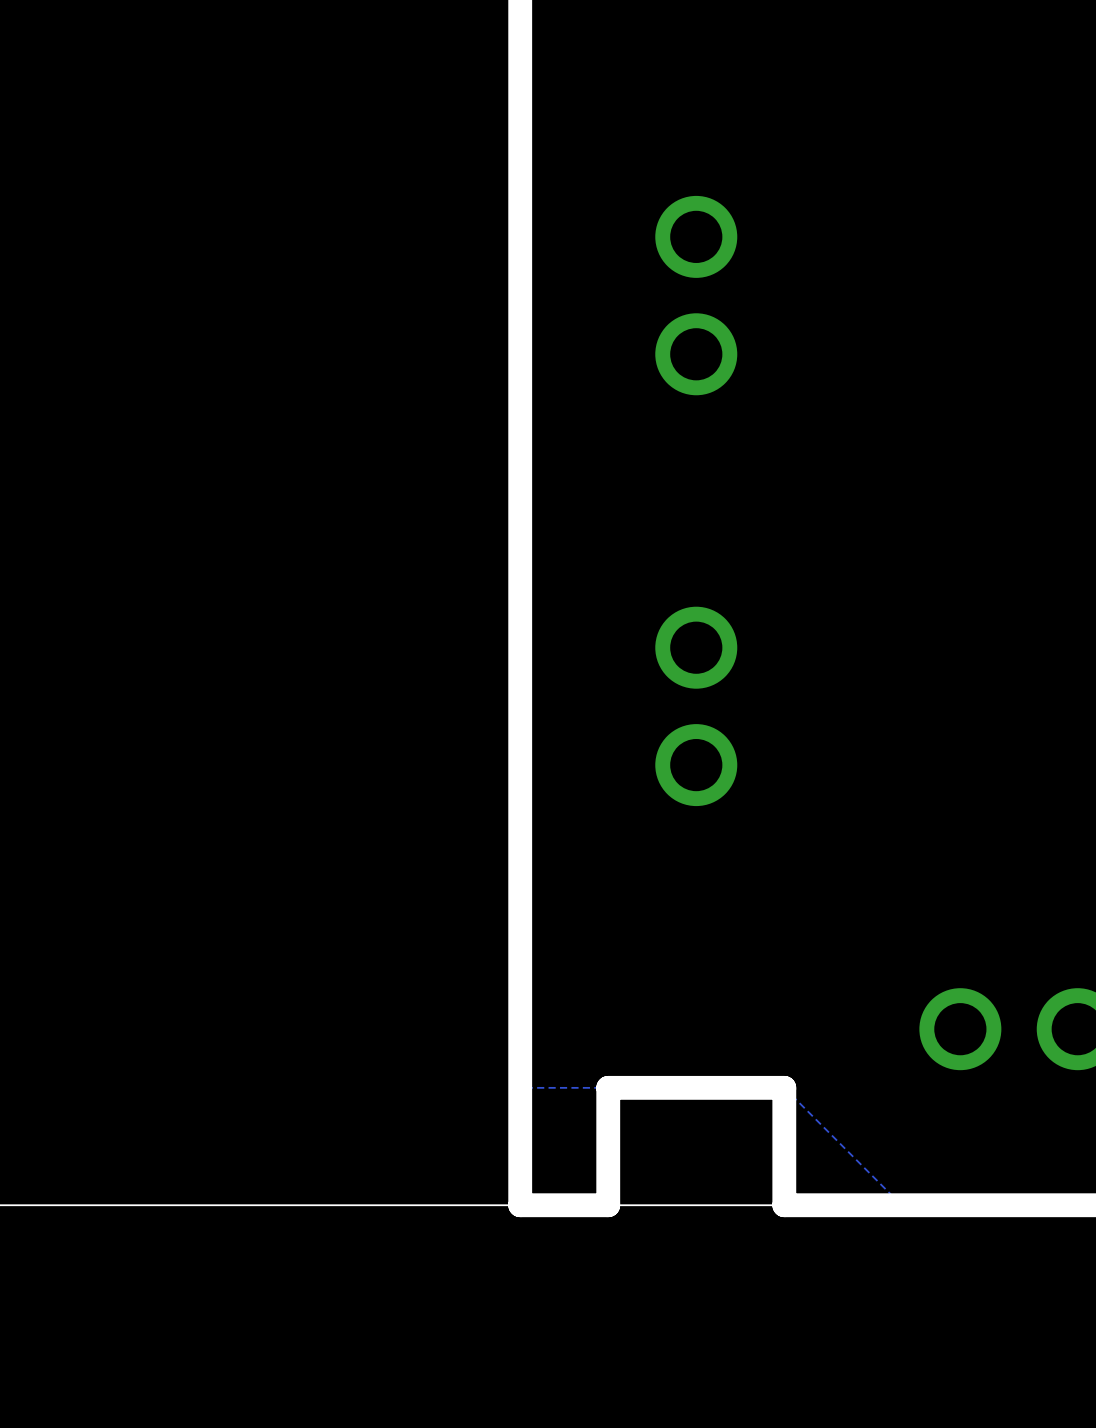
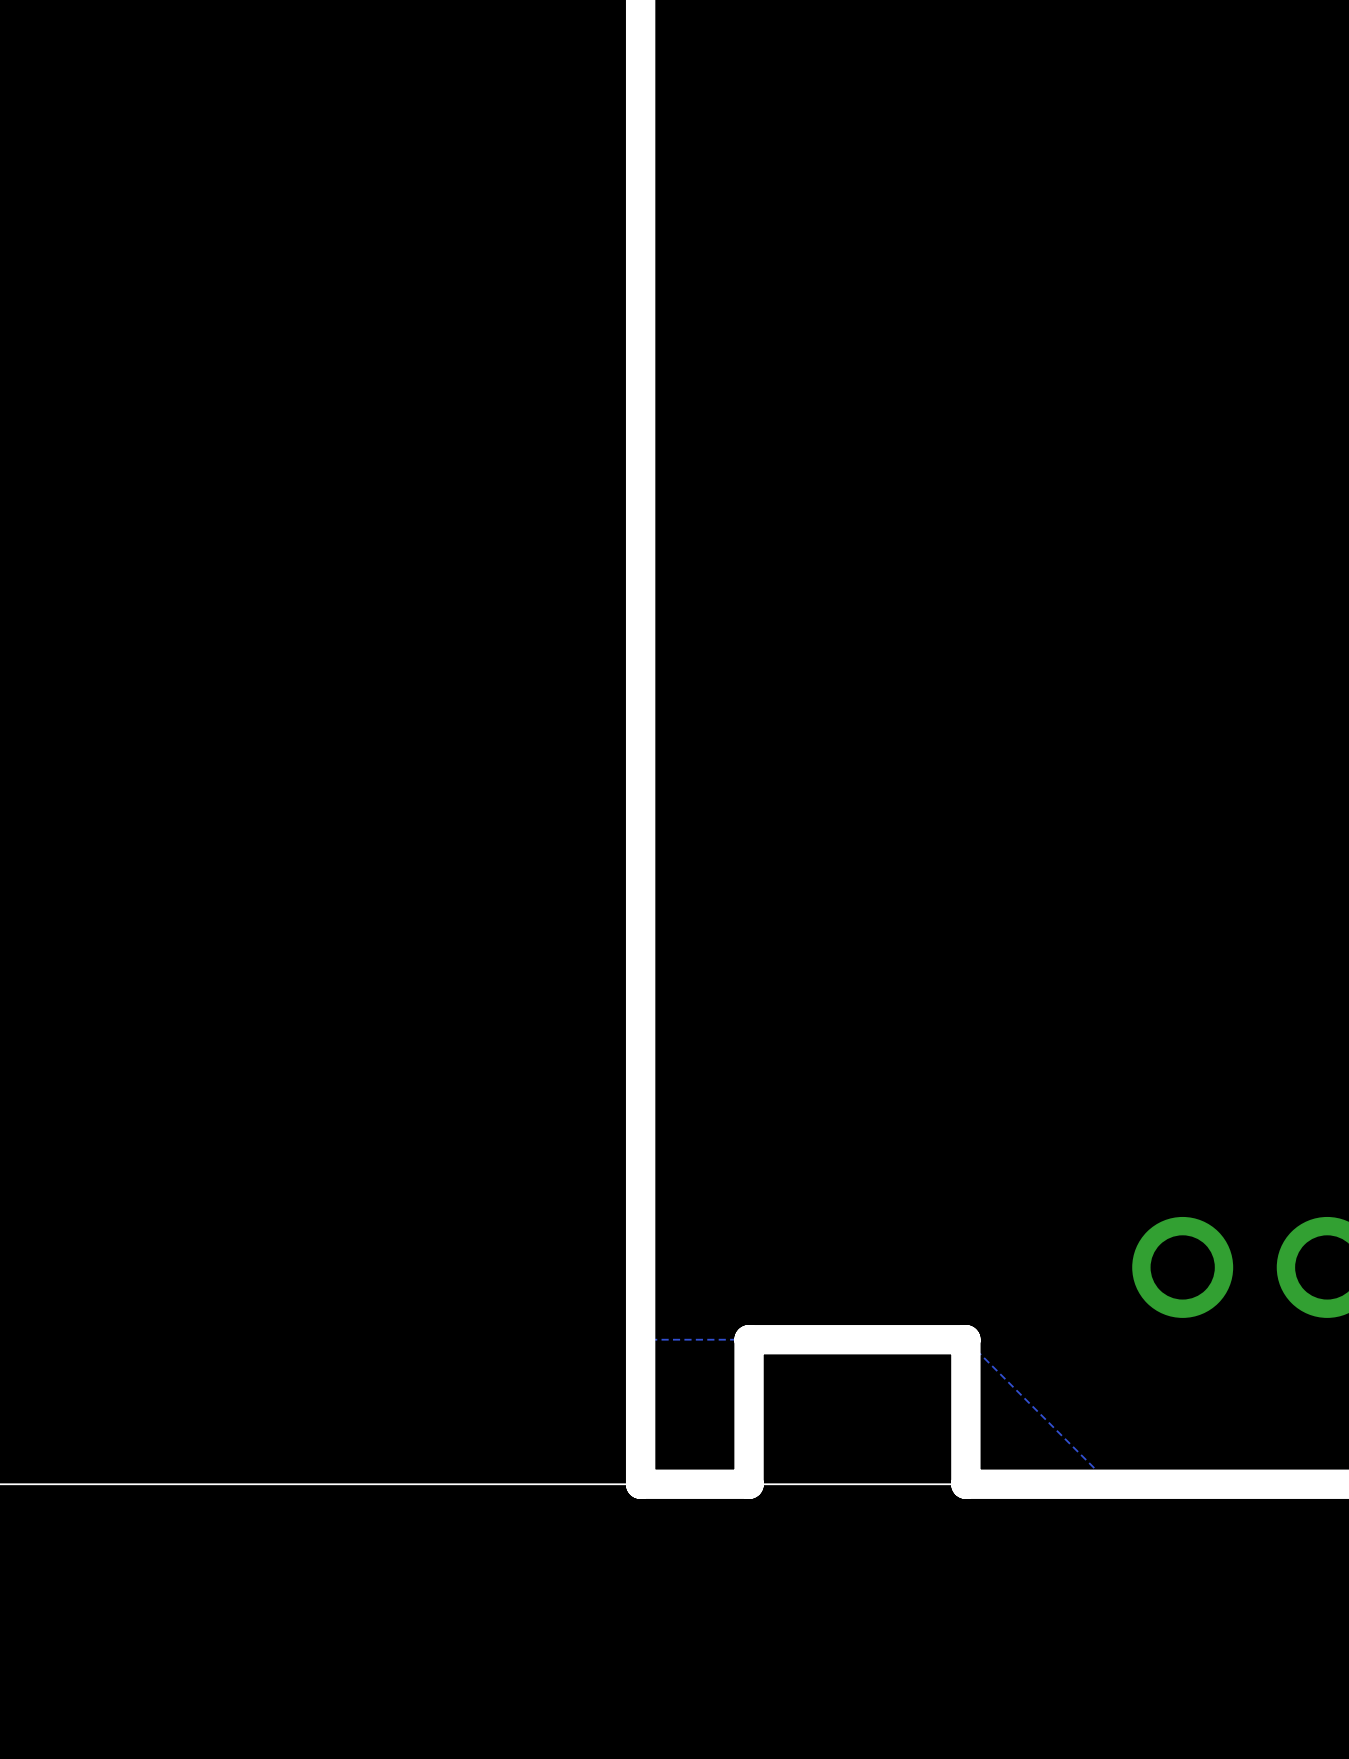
part: (696, 295) -> none
part: (696, 706) -> none

